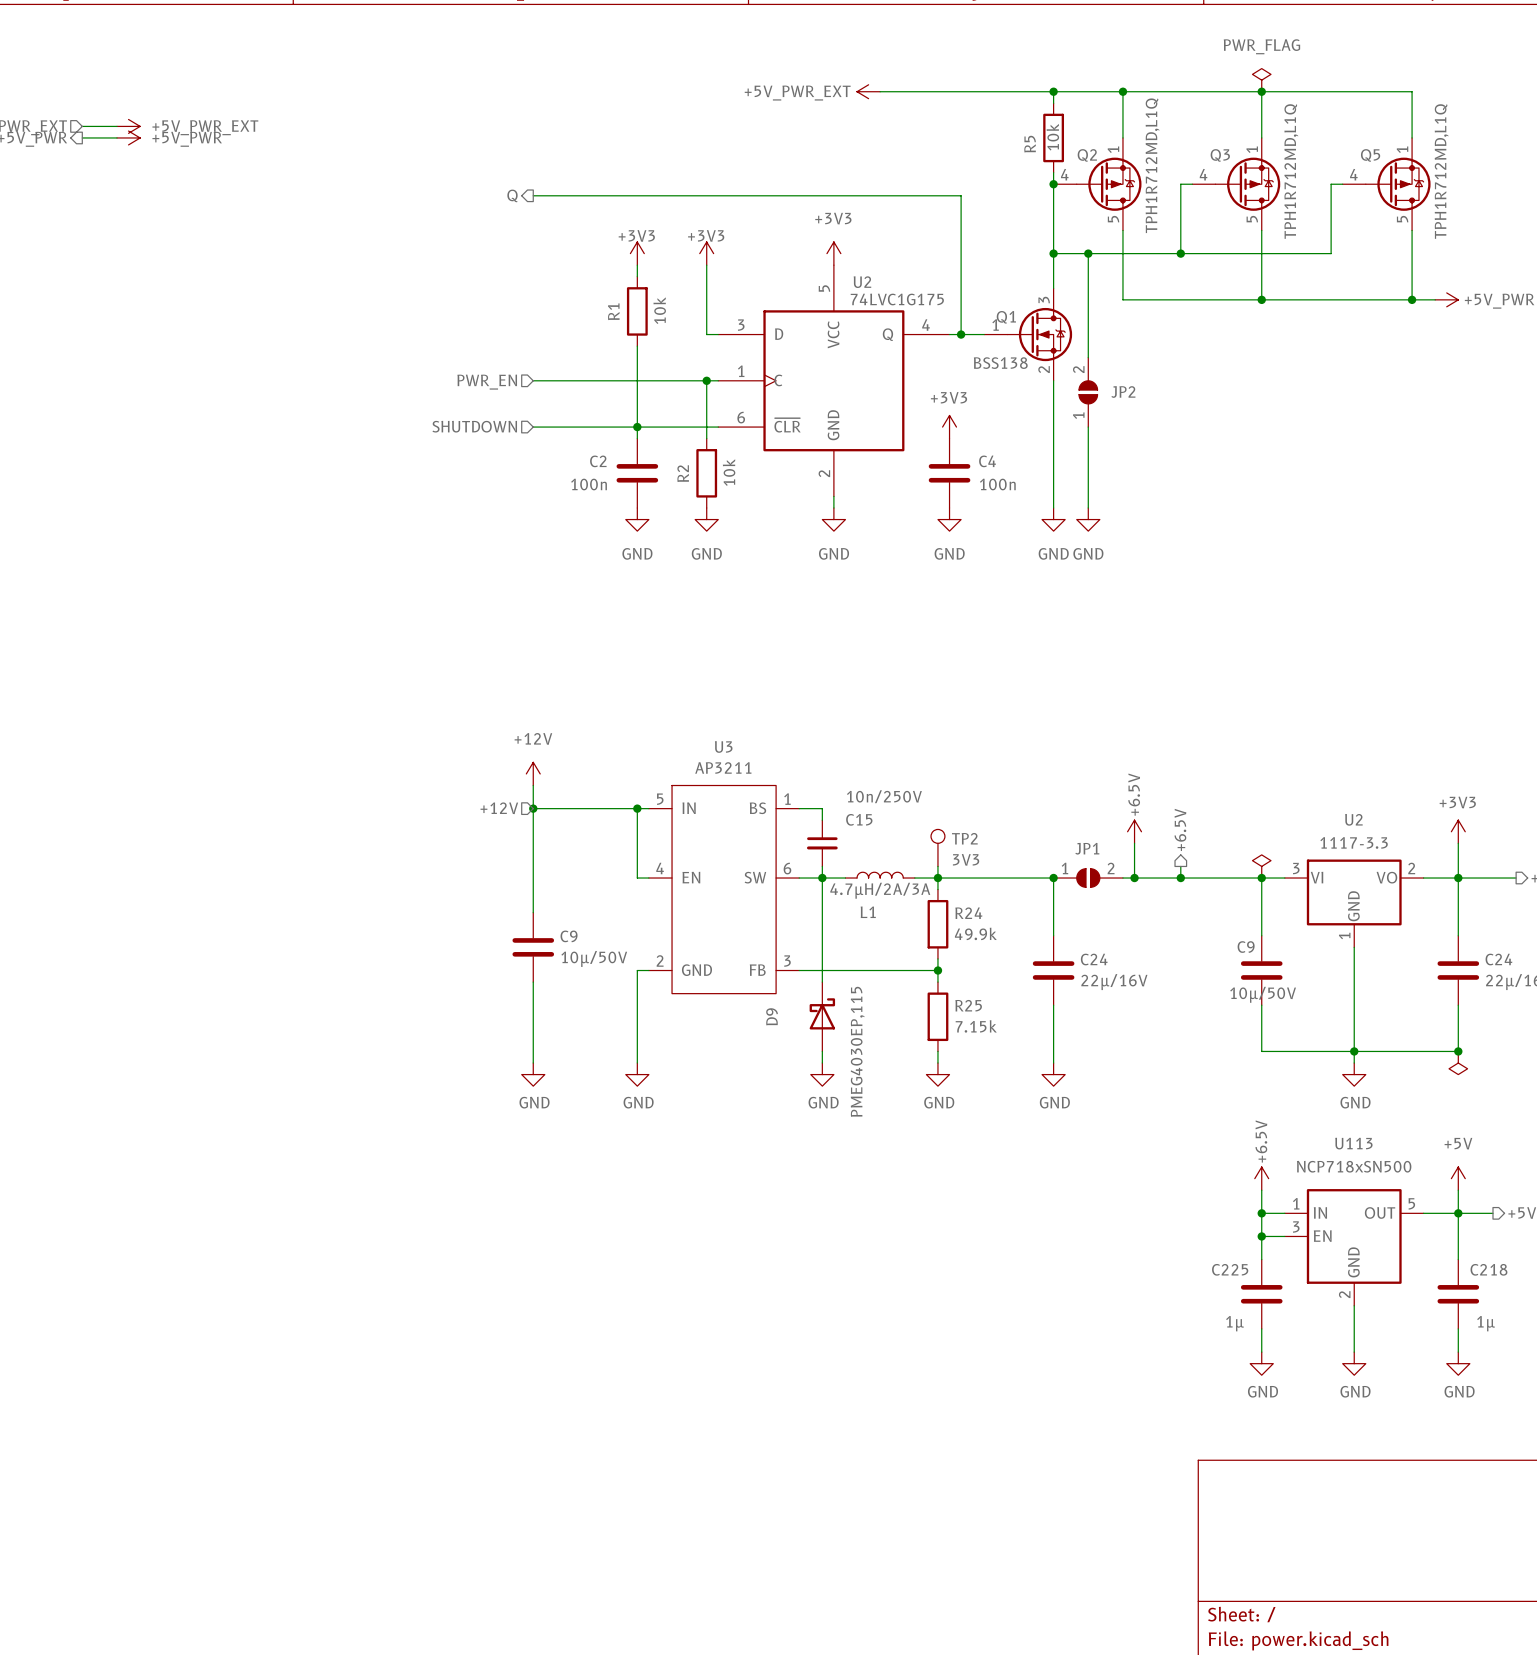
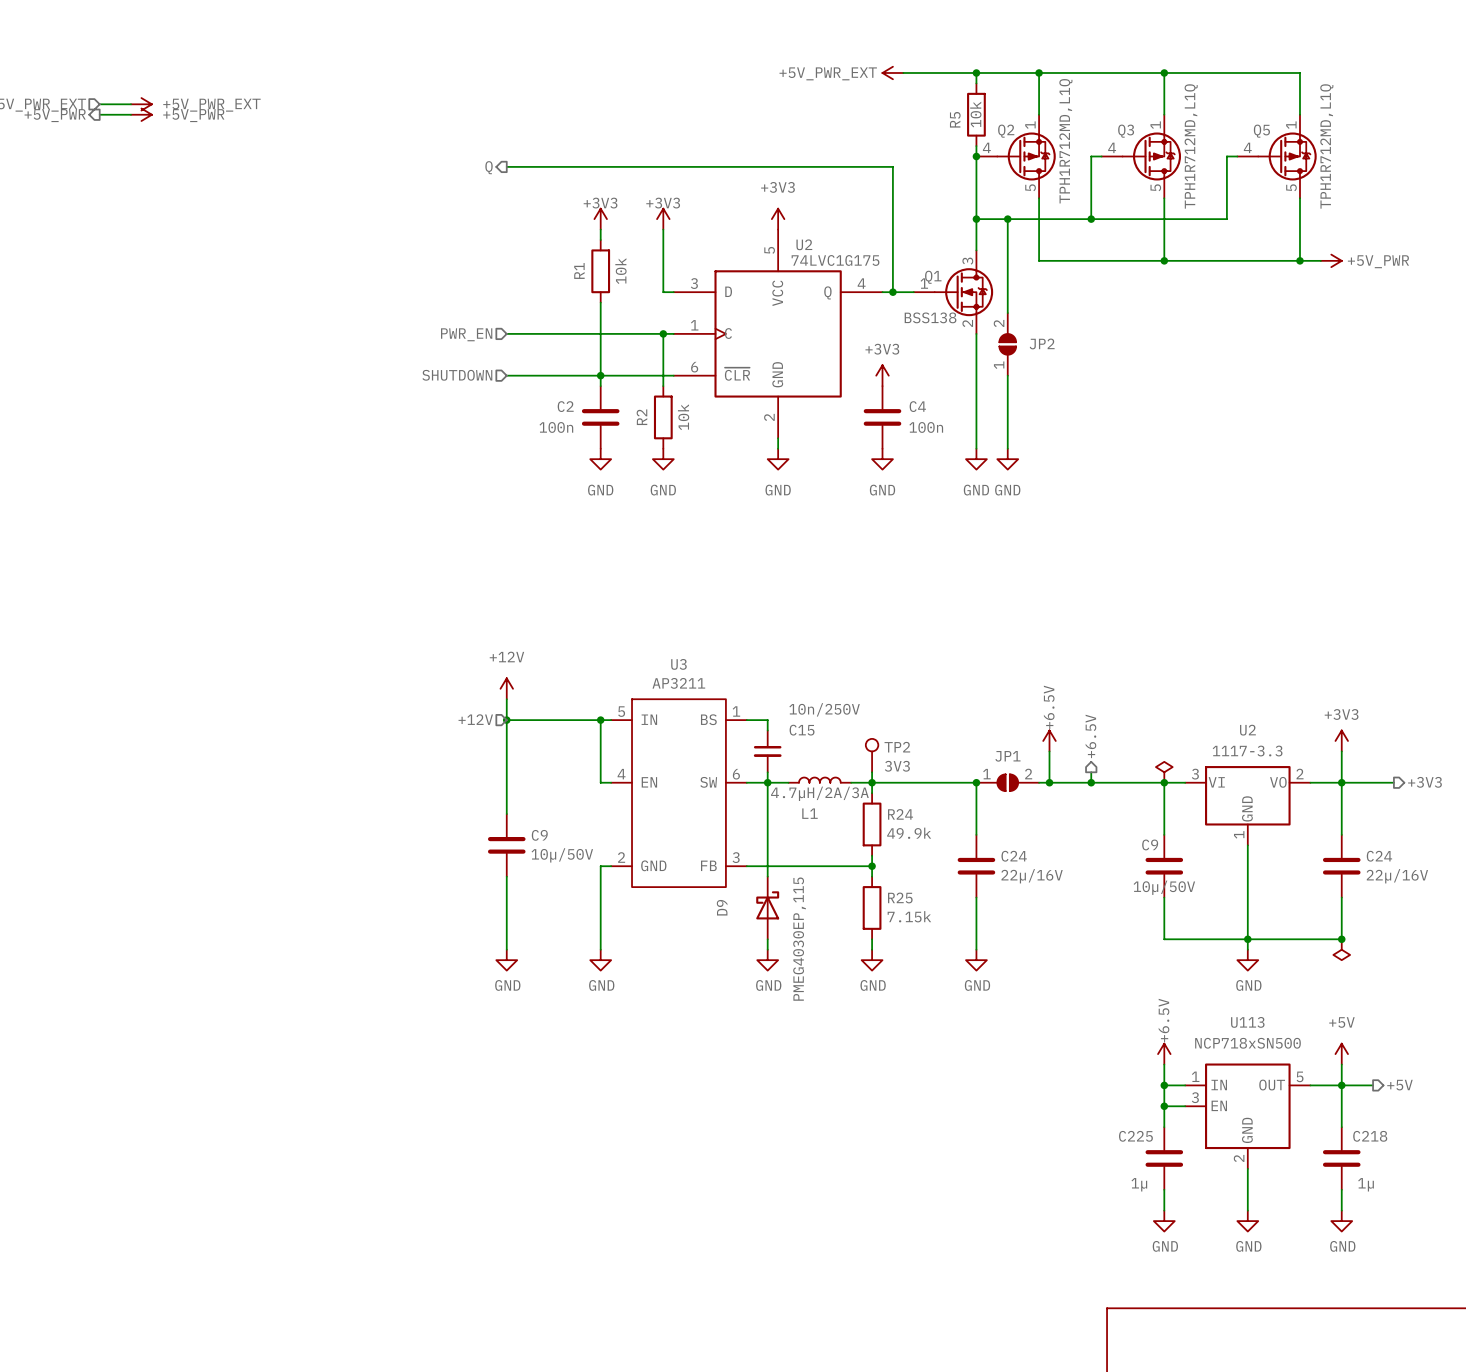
power symbol: PWR_FLAG (1261, 80) -> none
power symbol position: +5V_PWR_EXT (868, 91) -> +5V_PWR_EXT (892, 72)
wire: (880, 91) (972, 91) -> none

